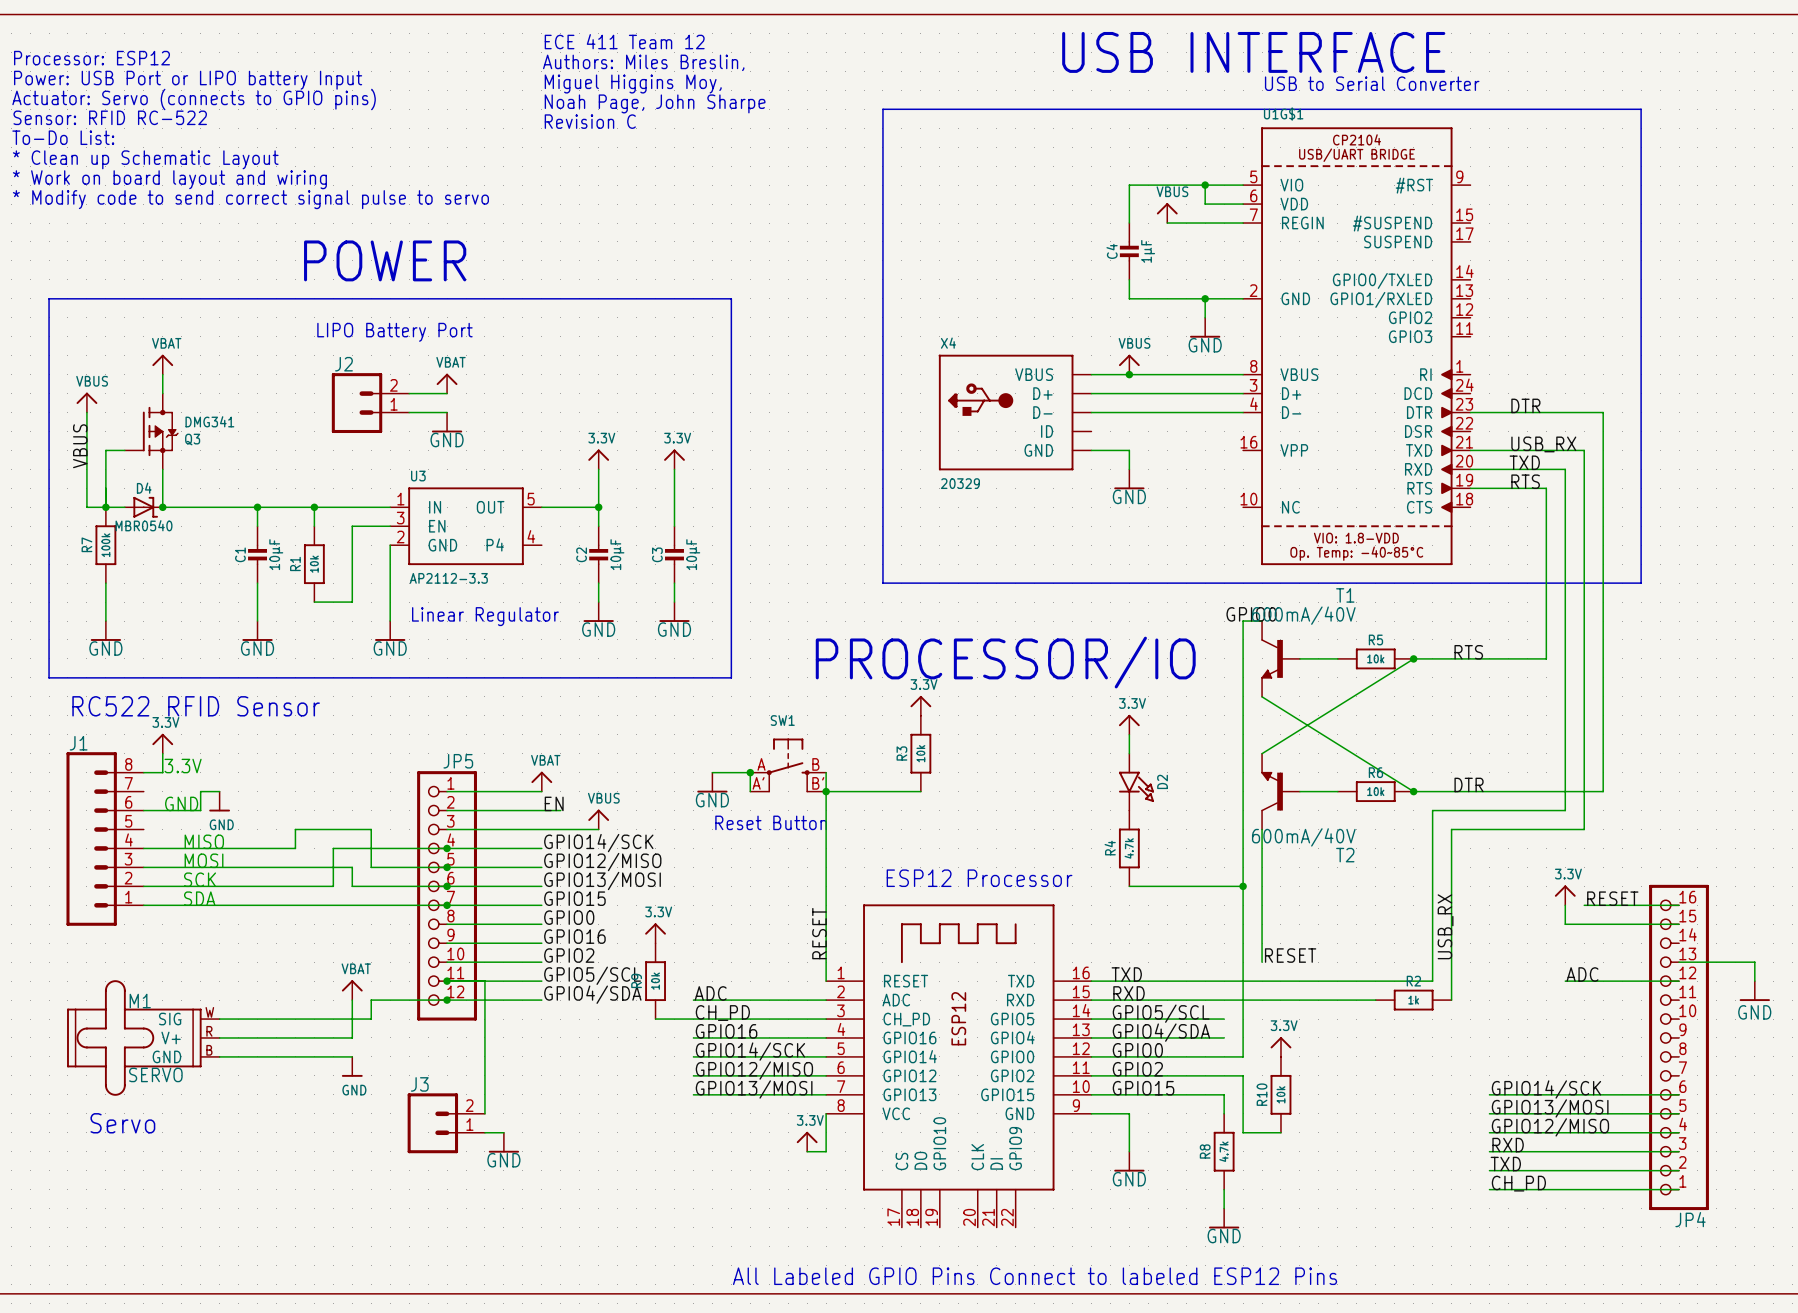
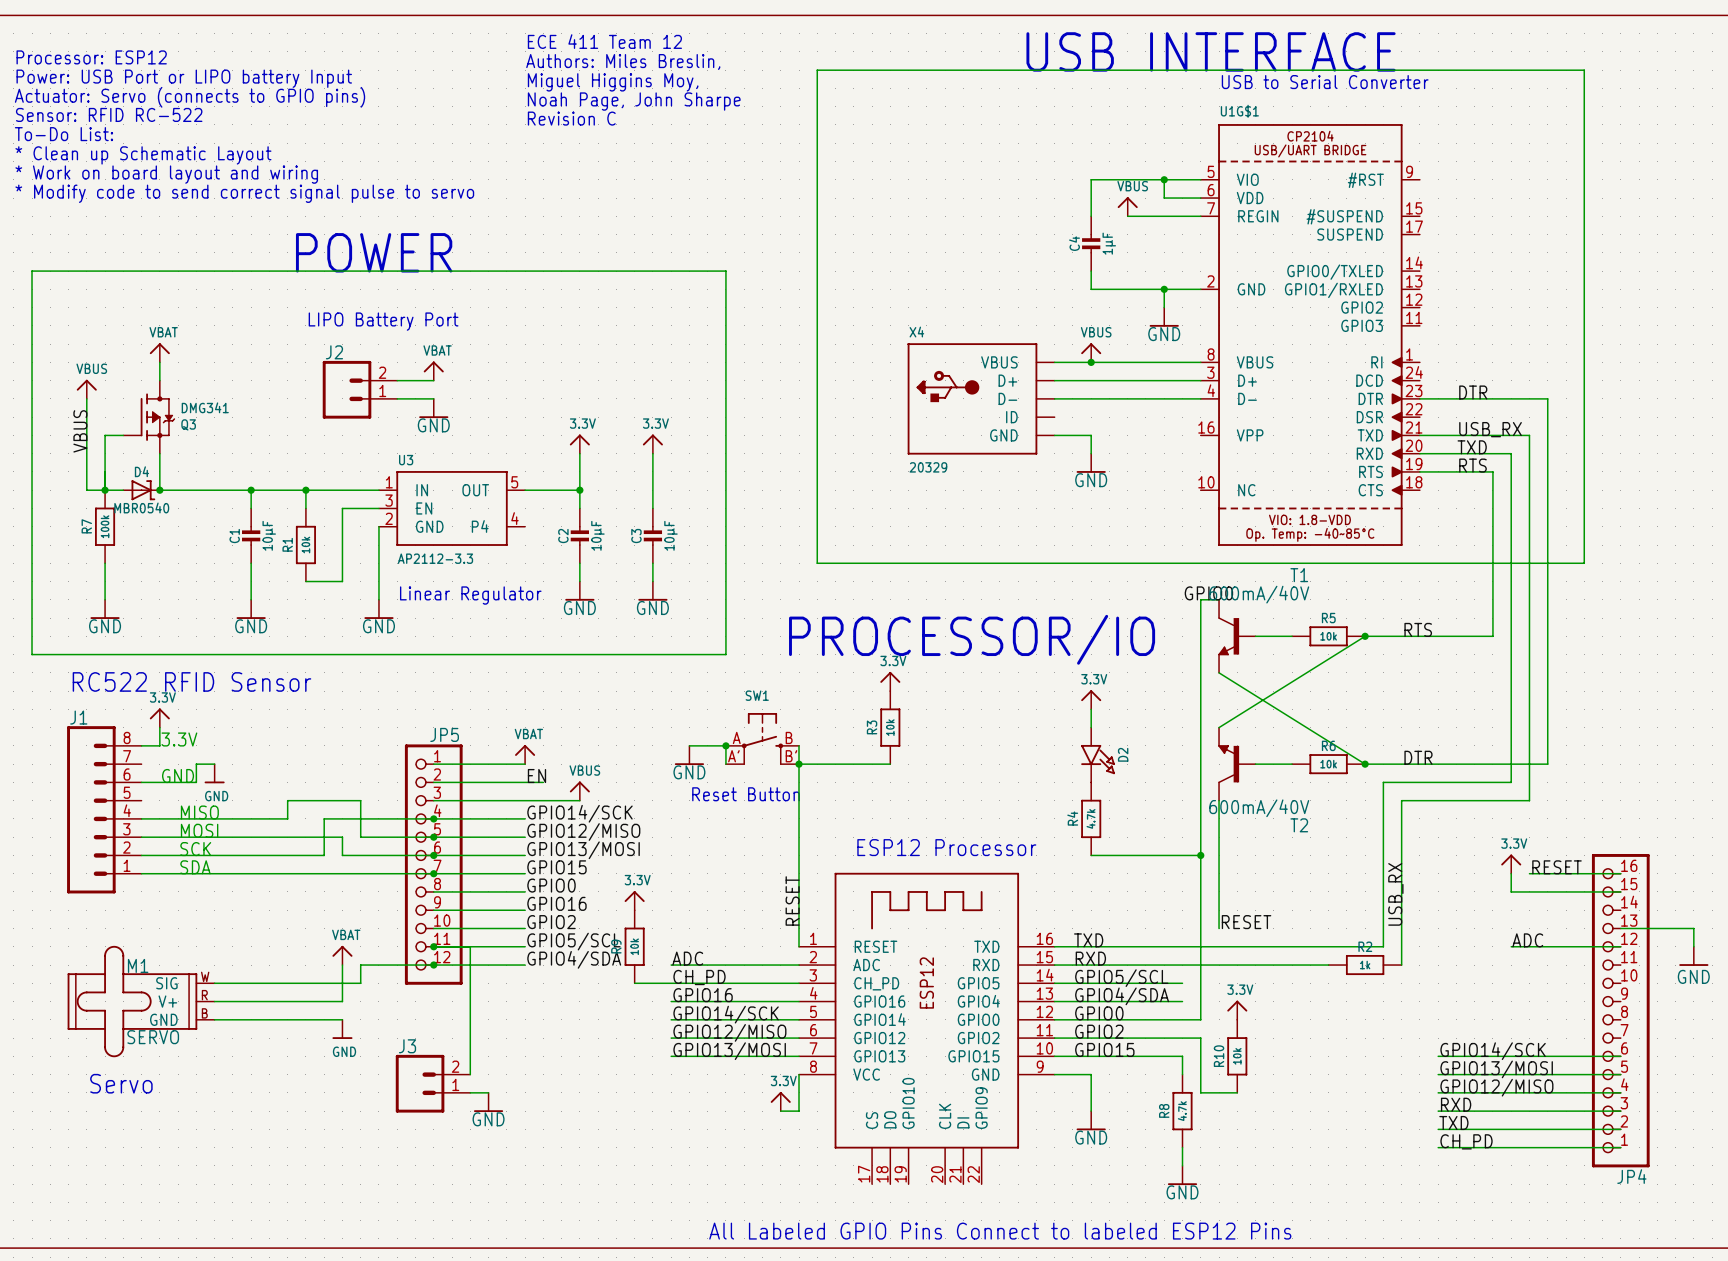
wire: none -> (817, 70) (1584, 70) (1584, 563) (817, 563) (817, 70)
line: (882, 109) (882, 583) (1641, 583) (1641, 109) (882, 109) -> none
wire: none -> (32, 271) (32, 654) (725, 654) (725, 271) (32, 271)
line: (49, 298) (49, 677) (731, 677) (731, 298) (49, 298) -> none

